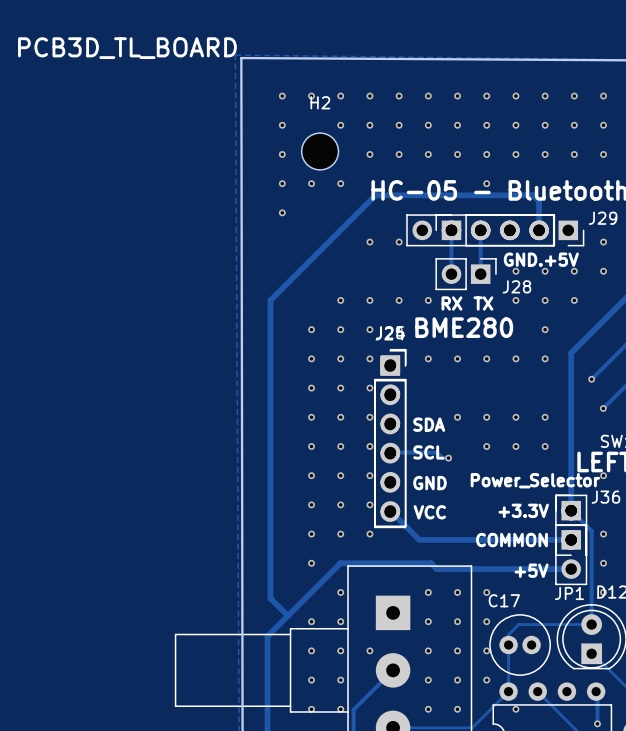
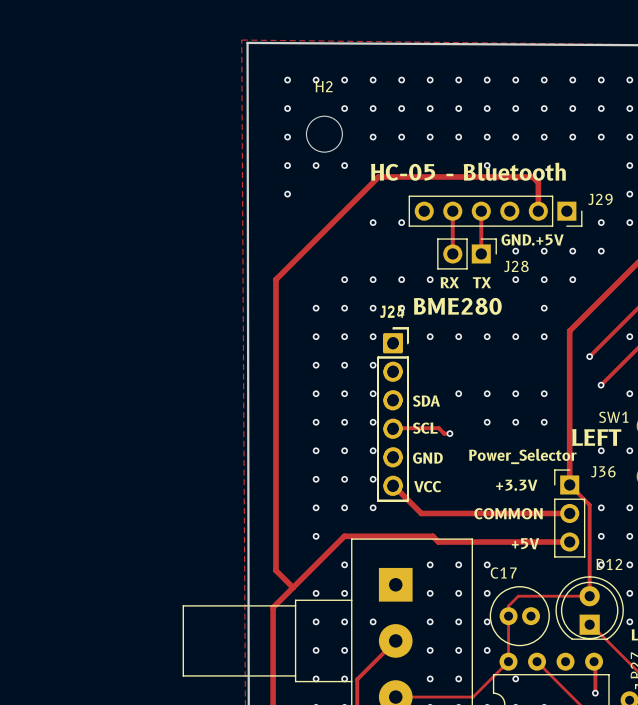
text: PCB3D_TL_BOARD (127, 48) -> none
part: (495, 230) -> none
JP1: (571, 525) -> none

